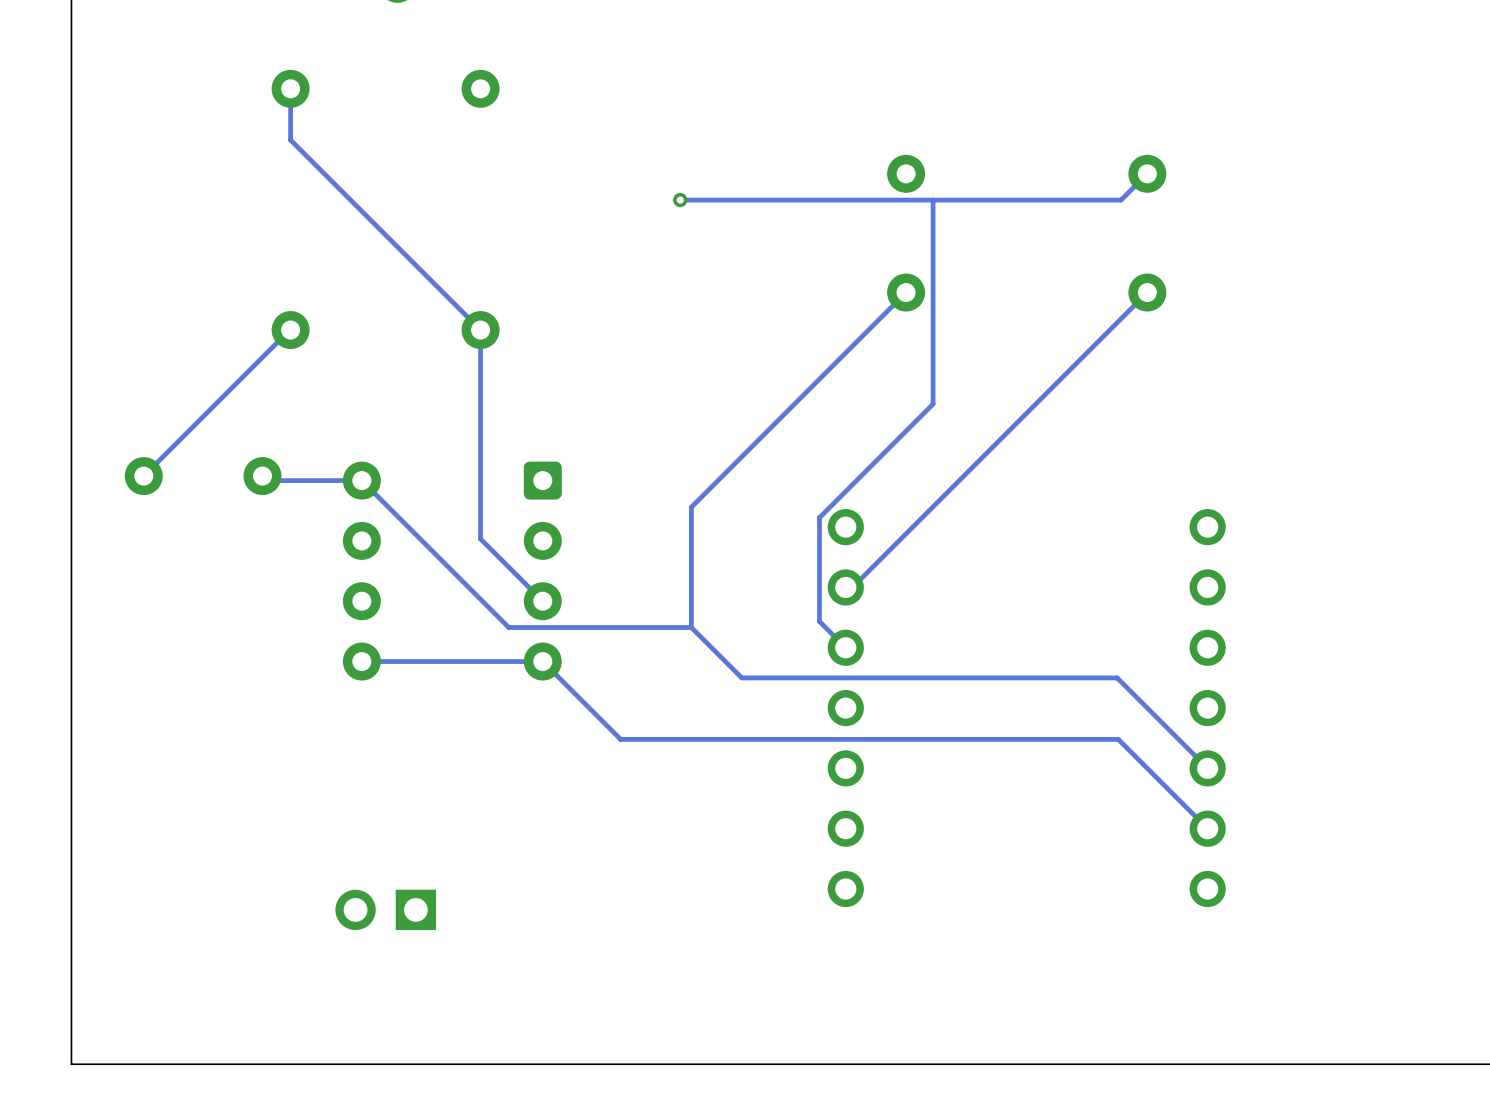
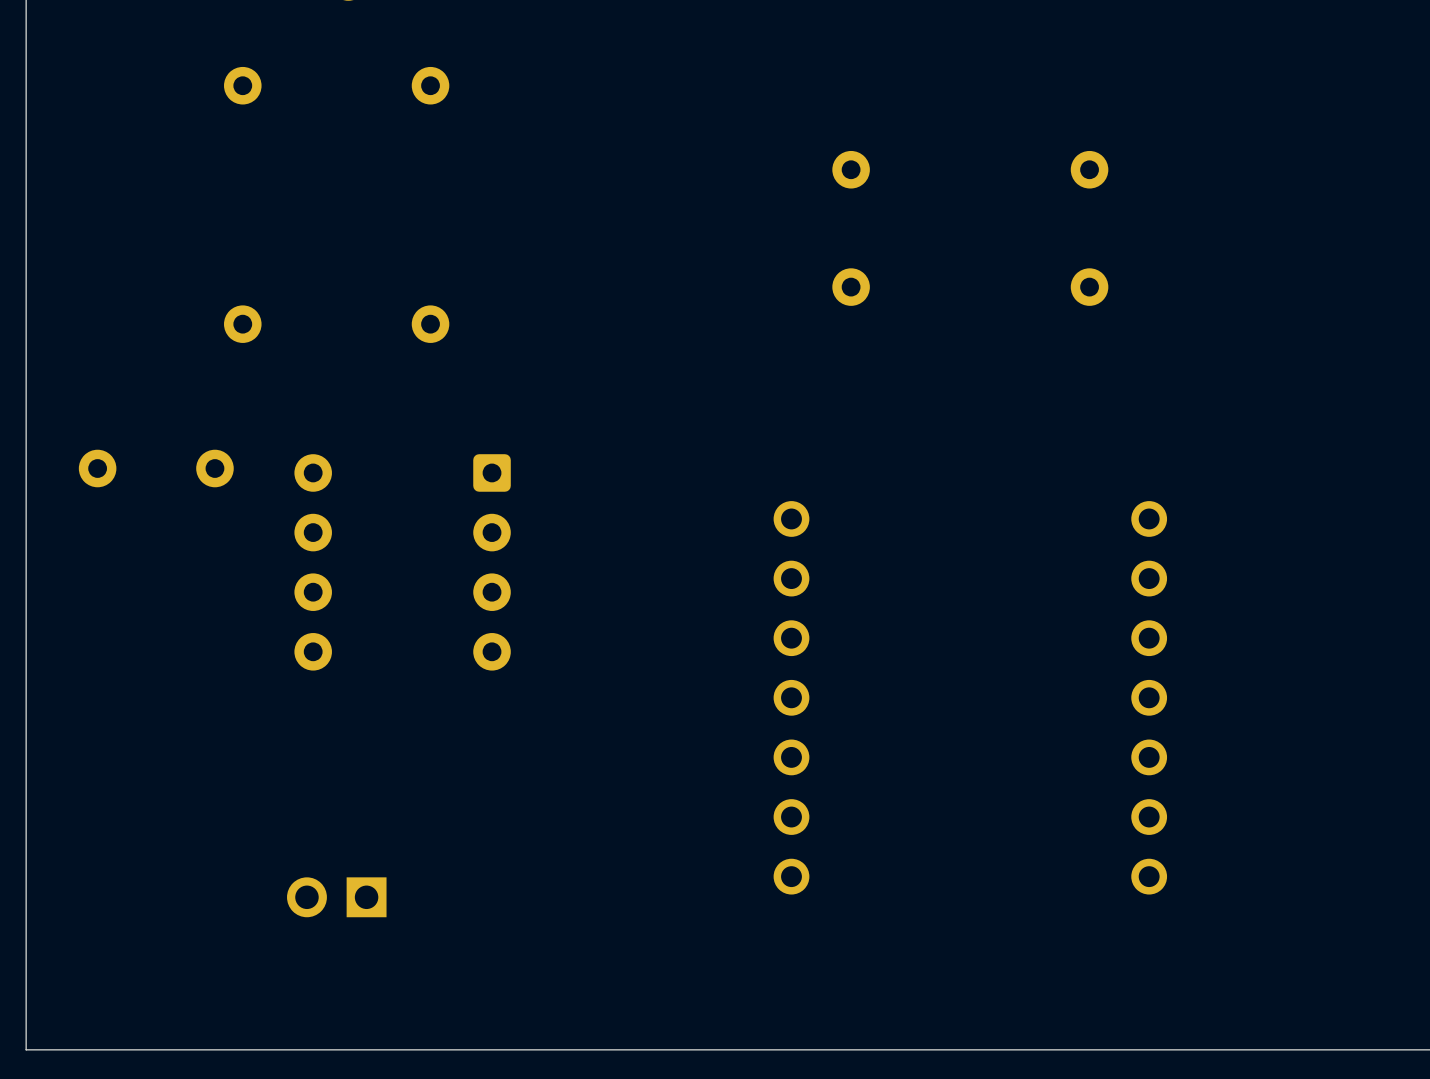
track: (290, 88) (290, 140) (480, 330) (480, 539) (542, 601) -> none
track: (1147, 173) (1121, 200) (680, 200) -> none
via: (680, 200) -> none
track: (933, 200) (933, 404) (819, 517) (819, 621) (845, 647) -> none
track: (906, 292) (691, 507) (691, 627) -> none
track: (1147, 292) (852, 587) (845, 587) -> none
track: (290, 330) (143, 476) -> none
track: (262, 476) (267, 480) (361, 480) (508, 627) (691, 627) -> none
track: (691, 627) (741, 677) (1117, 677) (1207, 768) -> none
track: (361, 661) (542, 661) (620, 739) (1118, 739) (1207, 828) -> none

